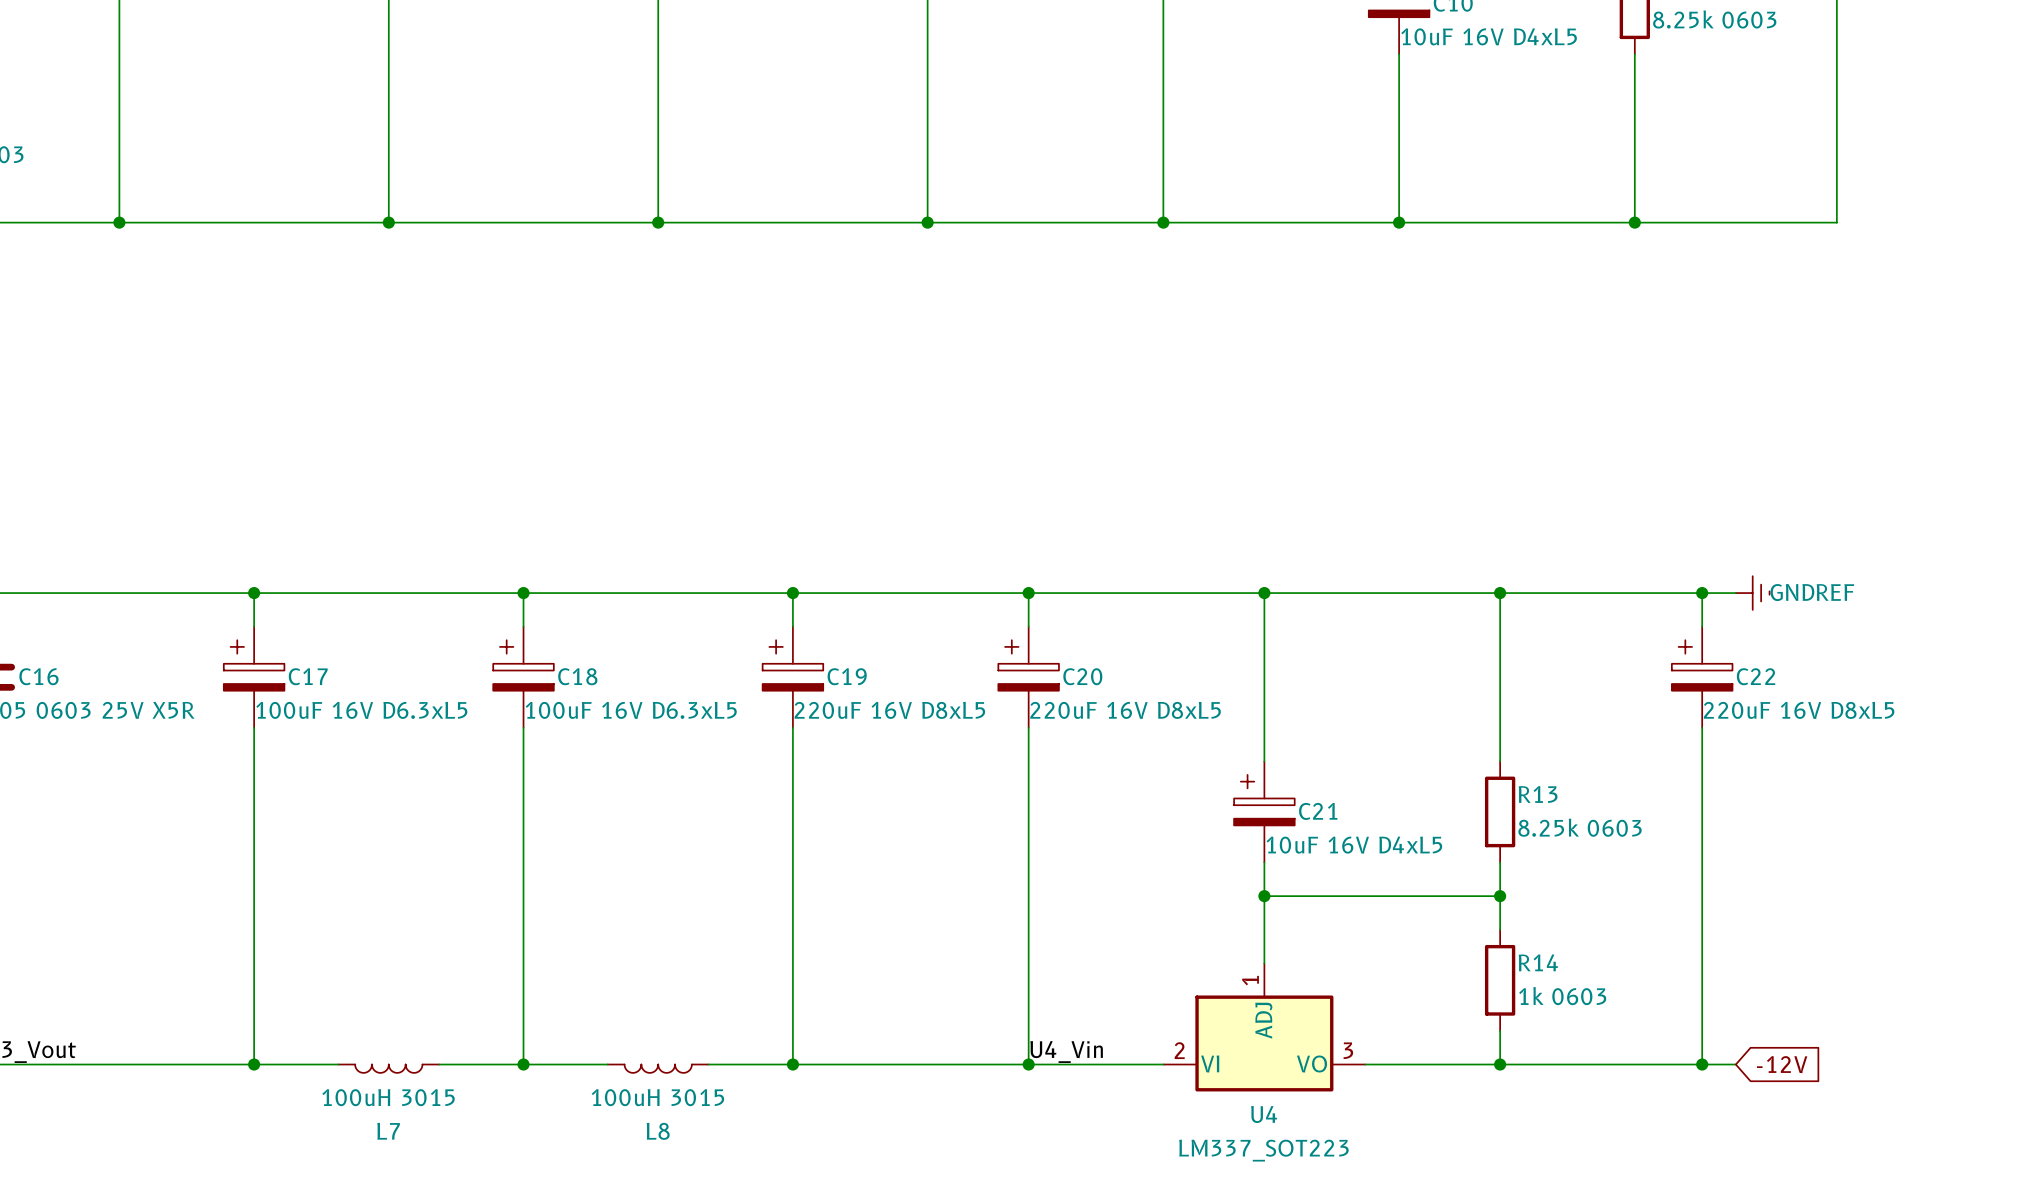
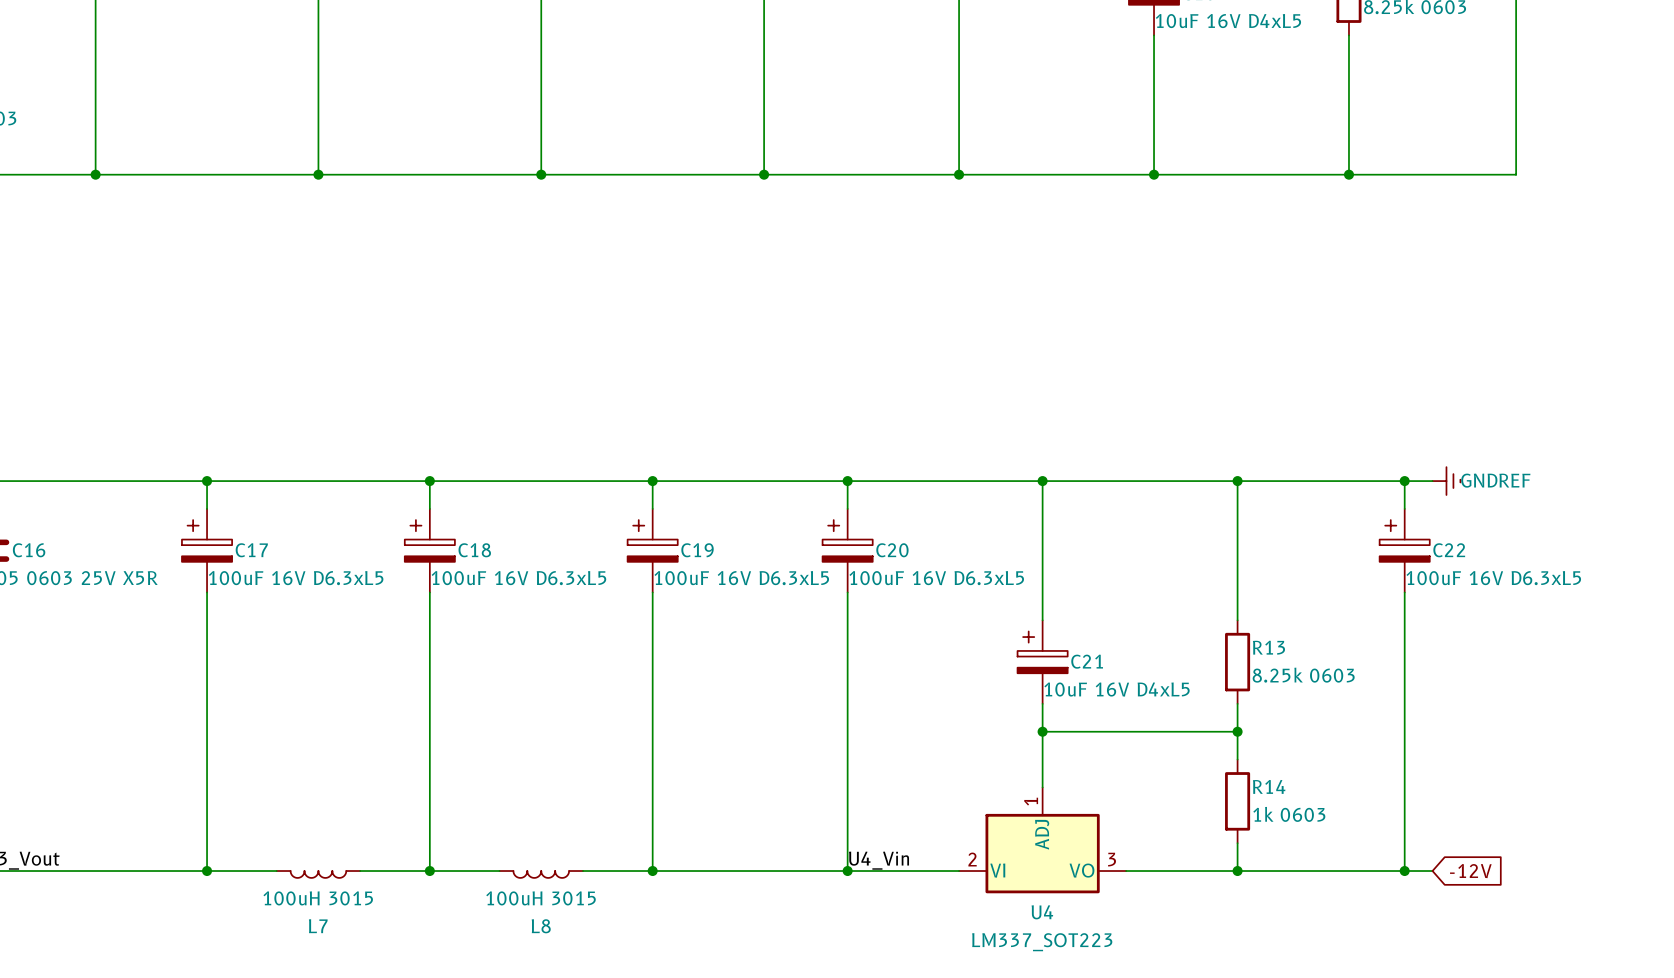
C19 value: 220uF 16V D8xL5 (889, 710) -> 100uF 16V D6.3xL5 (741, 578)
C20 value: 220uF 16V D8xL5 (1125, 710) -> 100uF 16V D6.3xL5 (936, 578)
C22 value: 220uF 16V D8xL5 (1799, 710) -> 100uF 16V D6.3xL5 (1493, 578)

